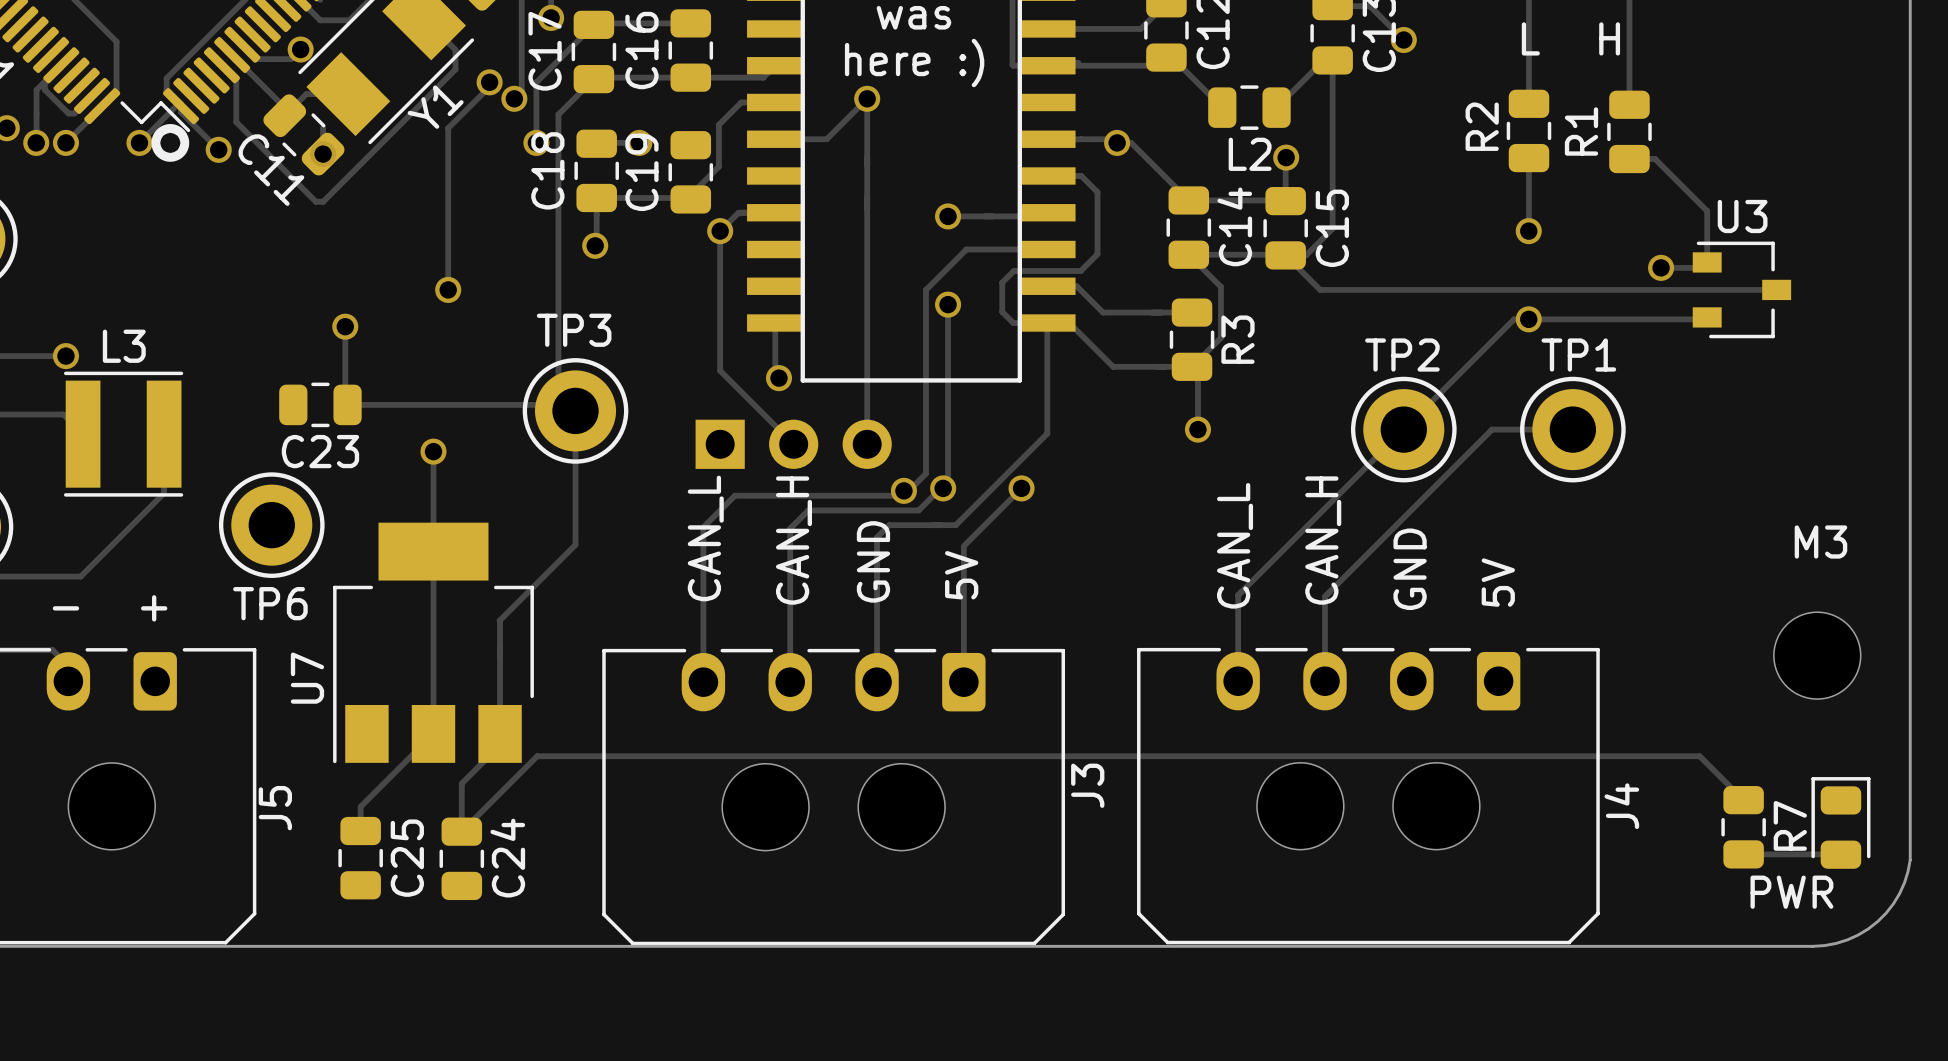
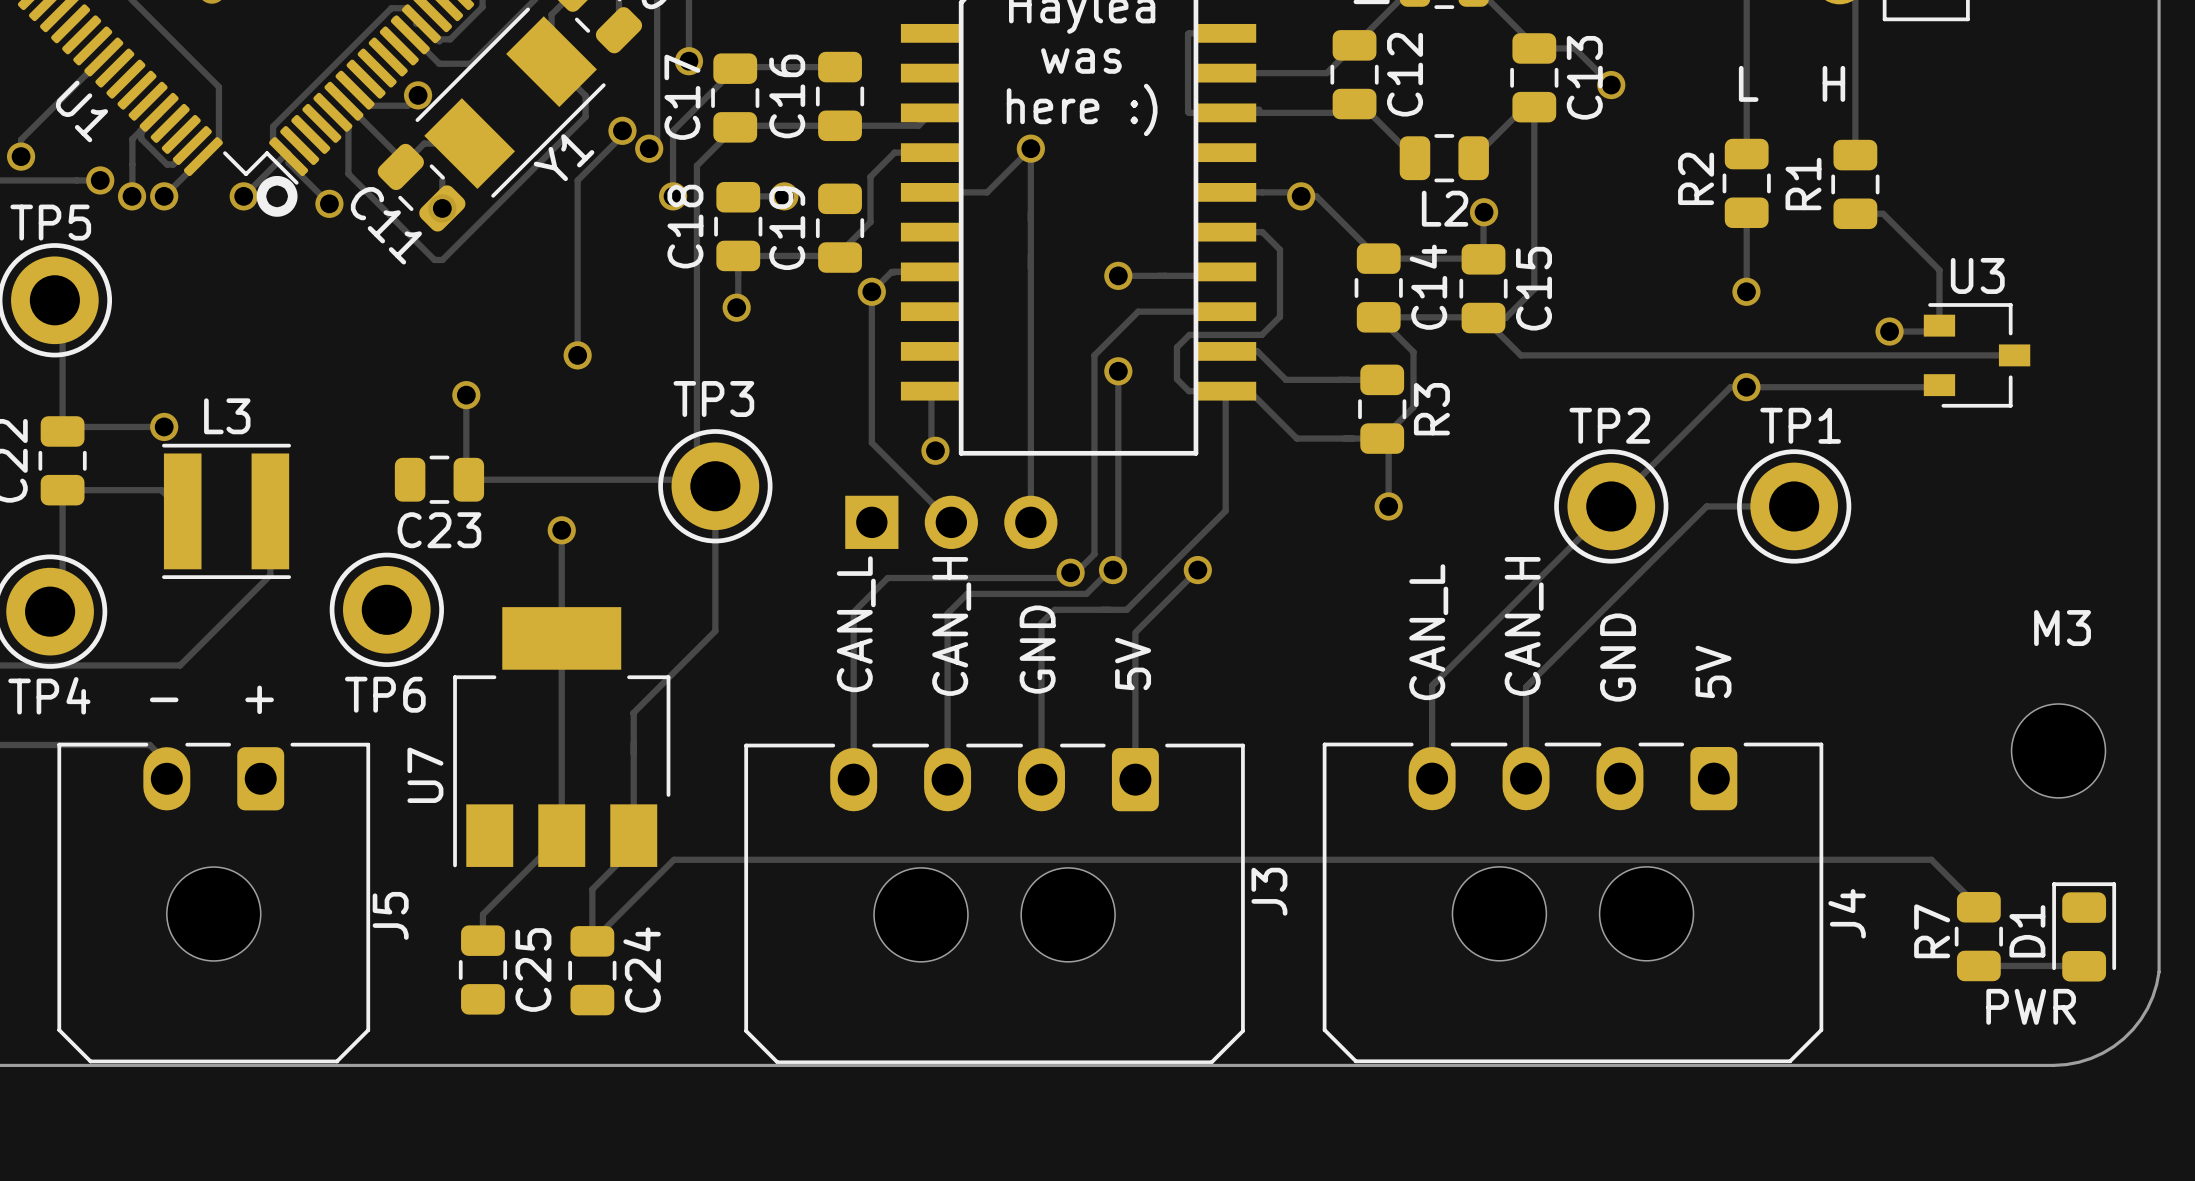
D1 name: none -> D1 (2027, 931)
R7 name position: R7 (1790, 825) -> R7 (1932, 931)

